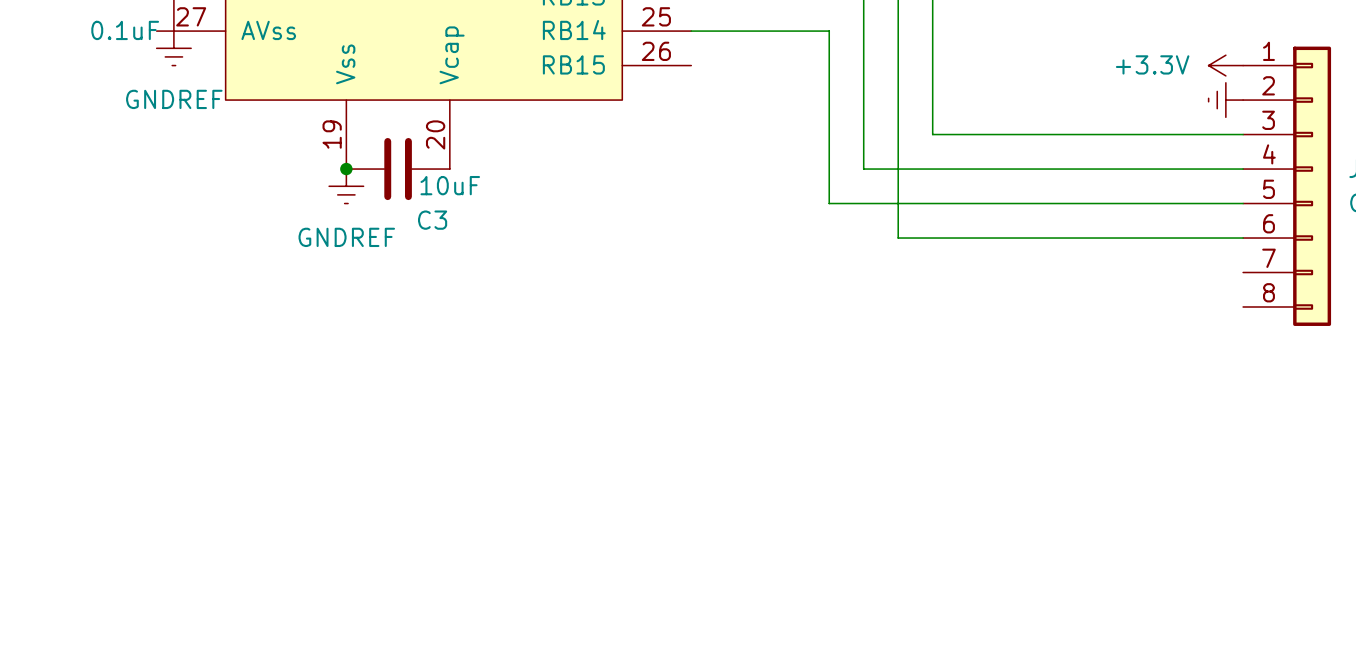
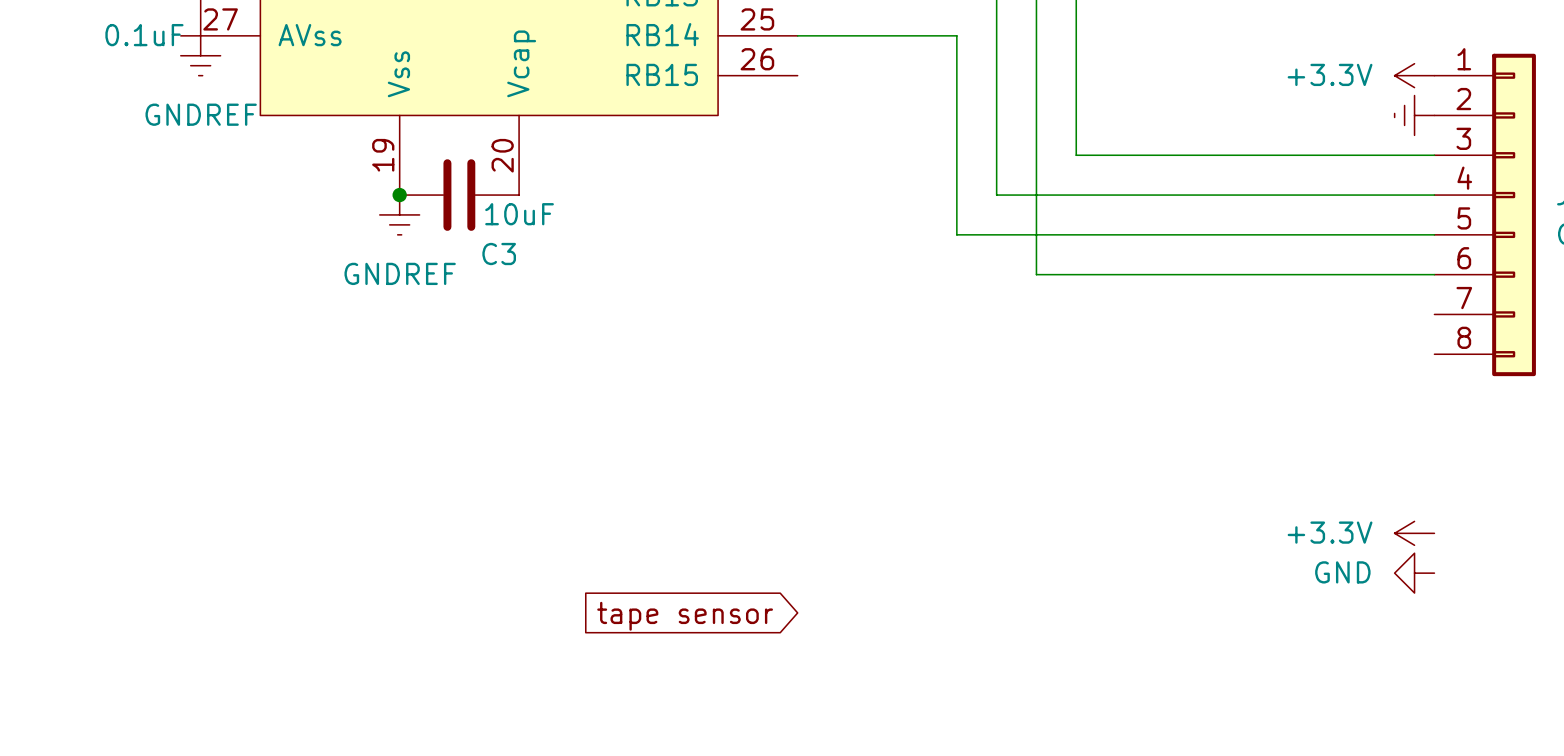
power symbol: none -> +3.3V (1414, 533)
power symbol: none -> GND (1414, 573)
global label: none -> tape sensor (685, 616)

